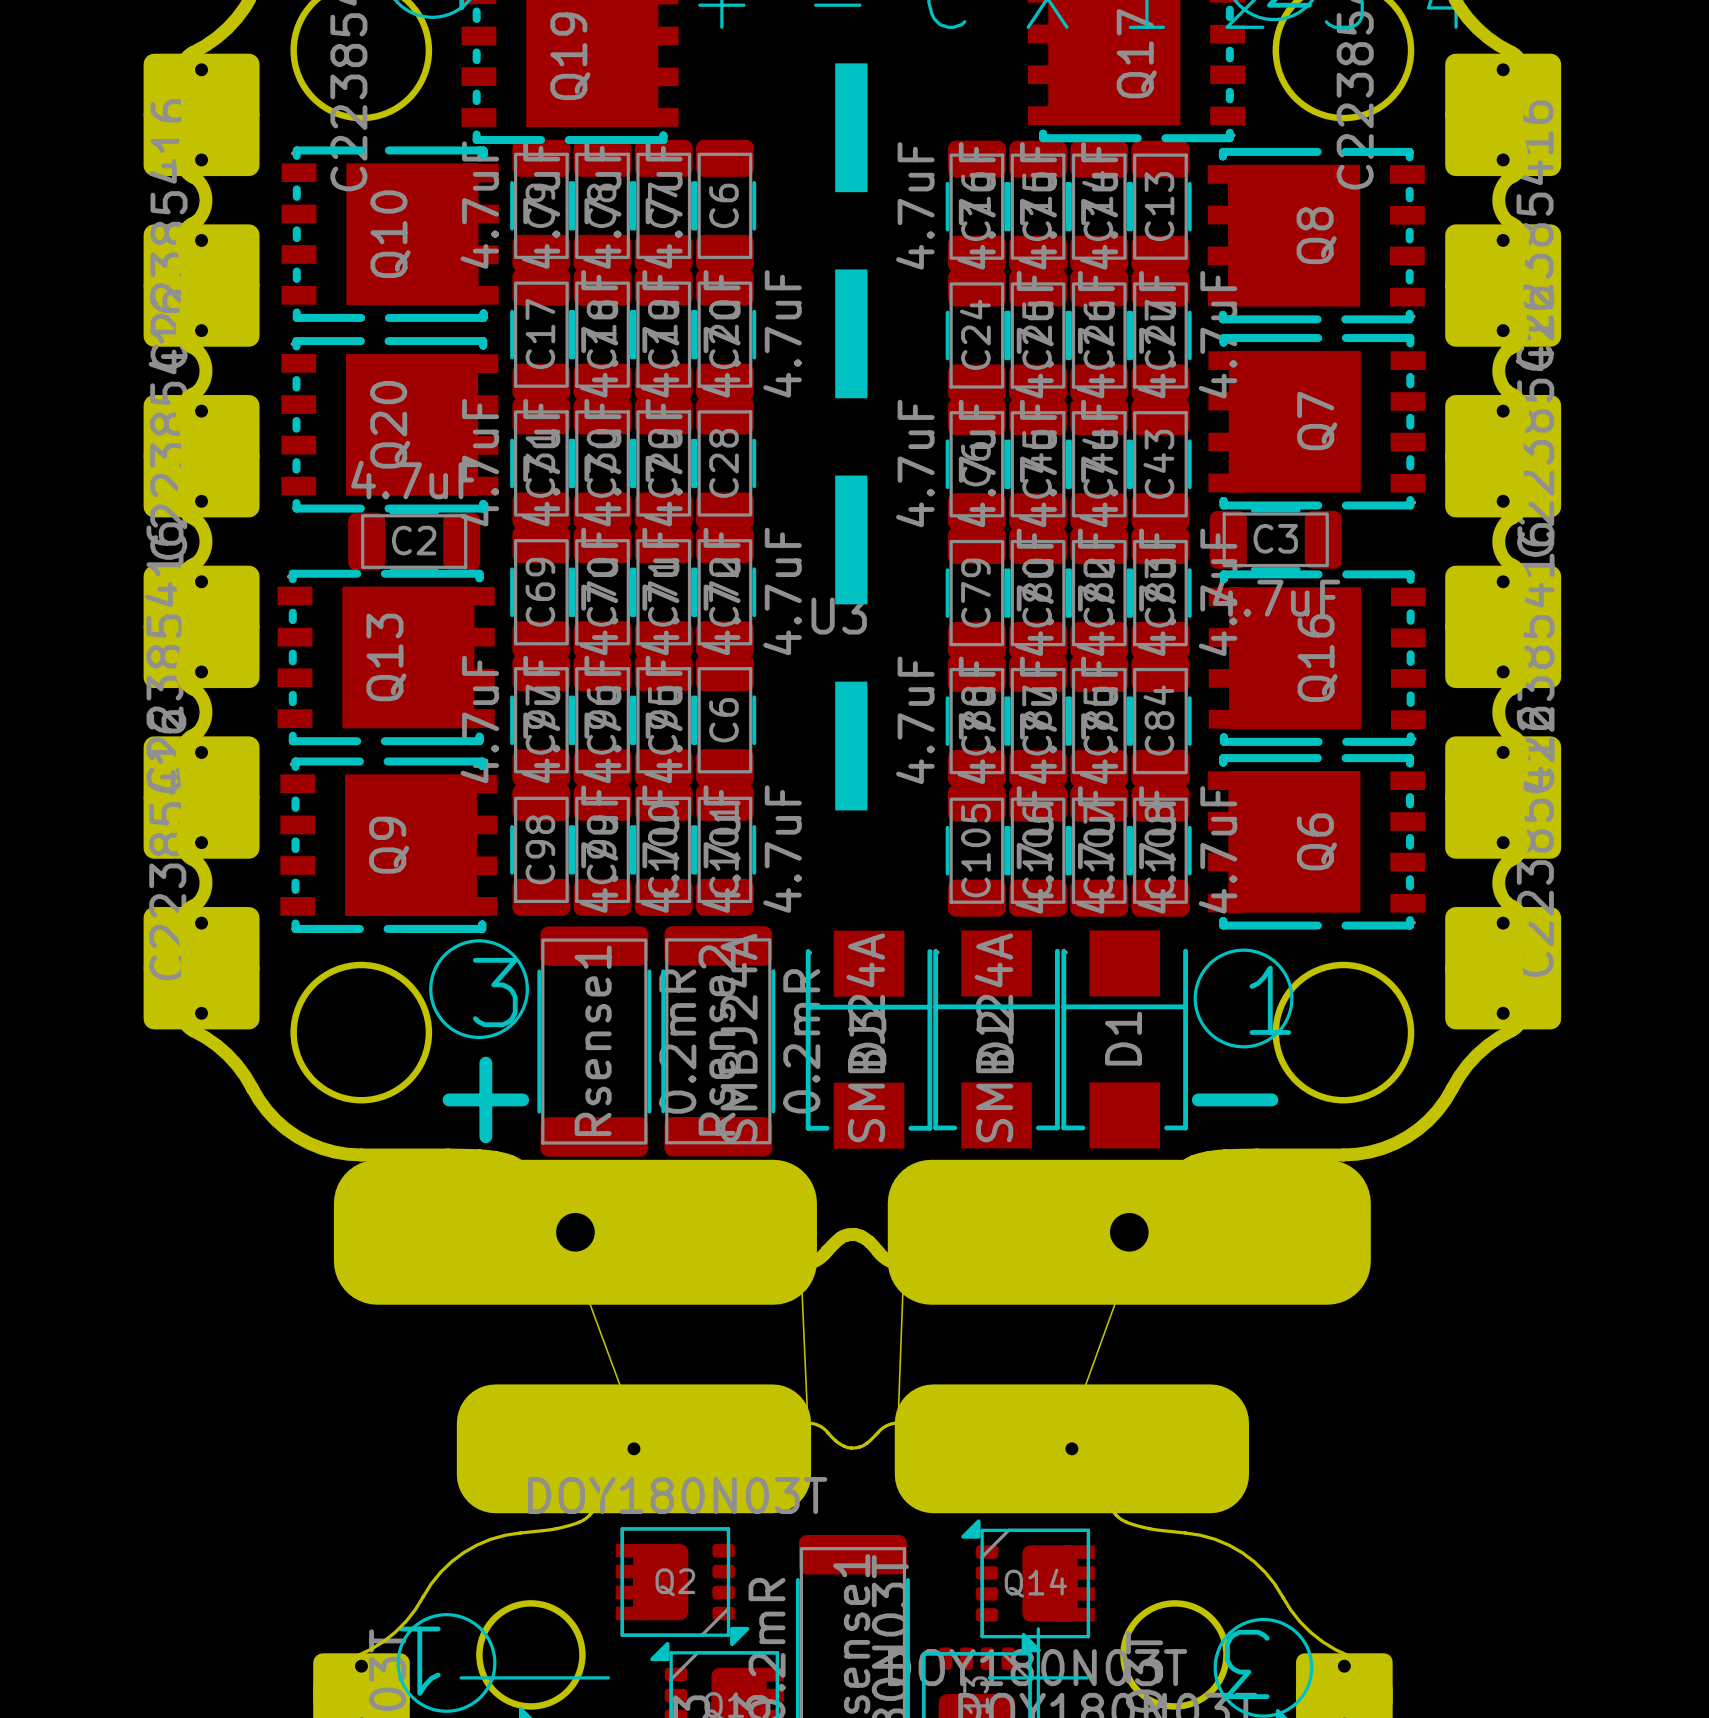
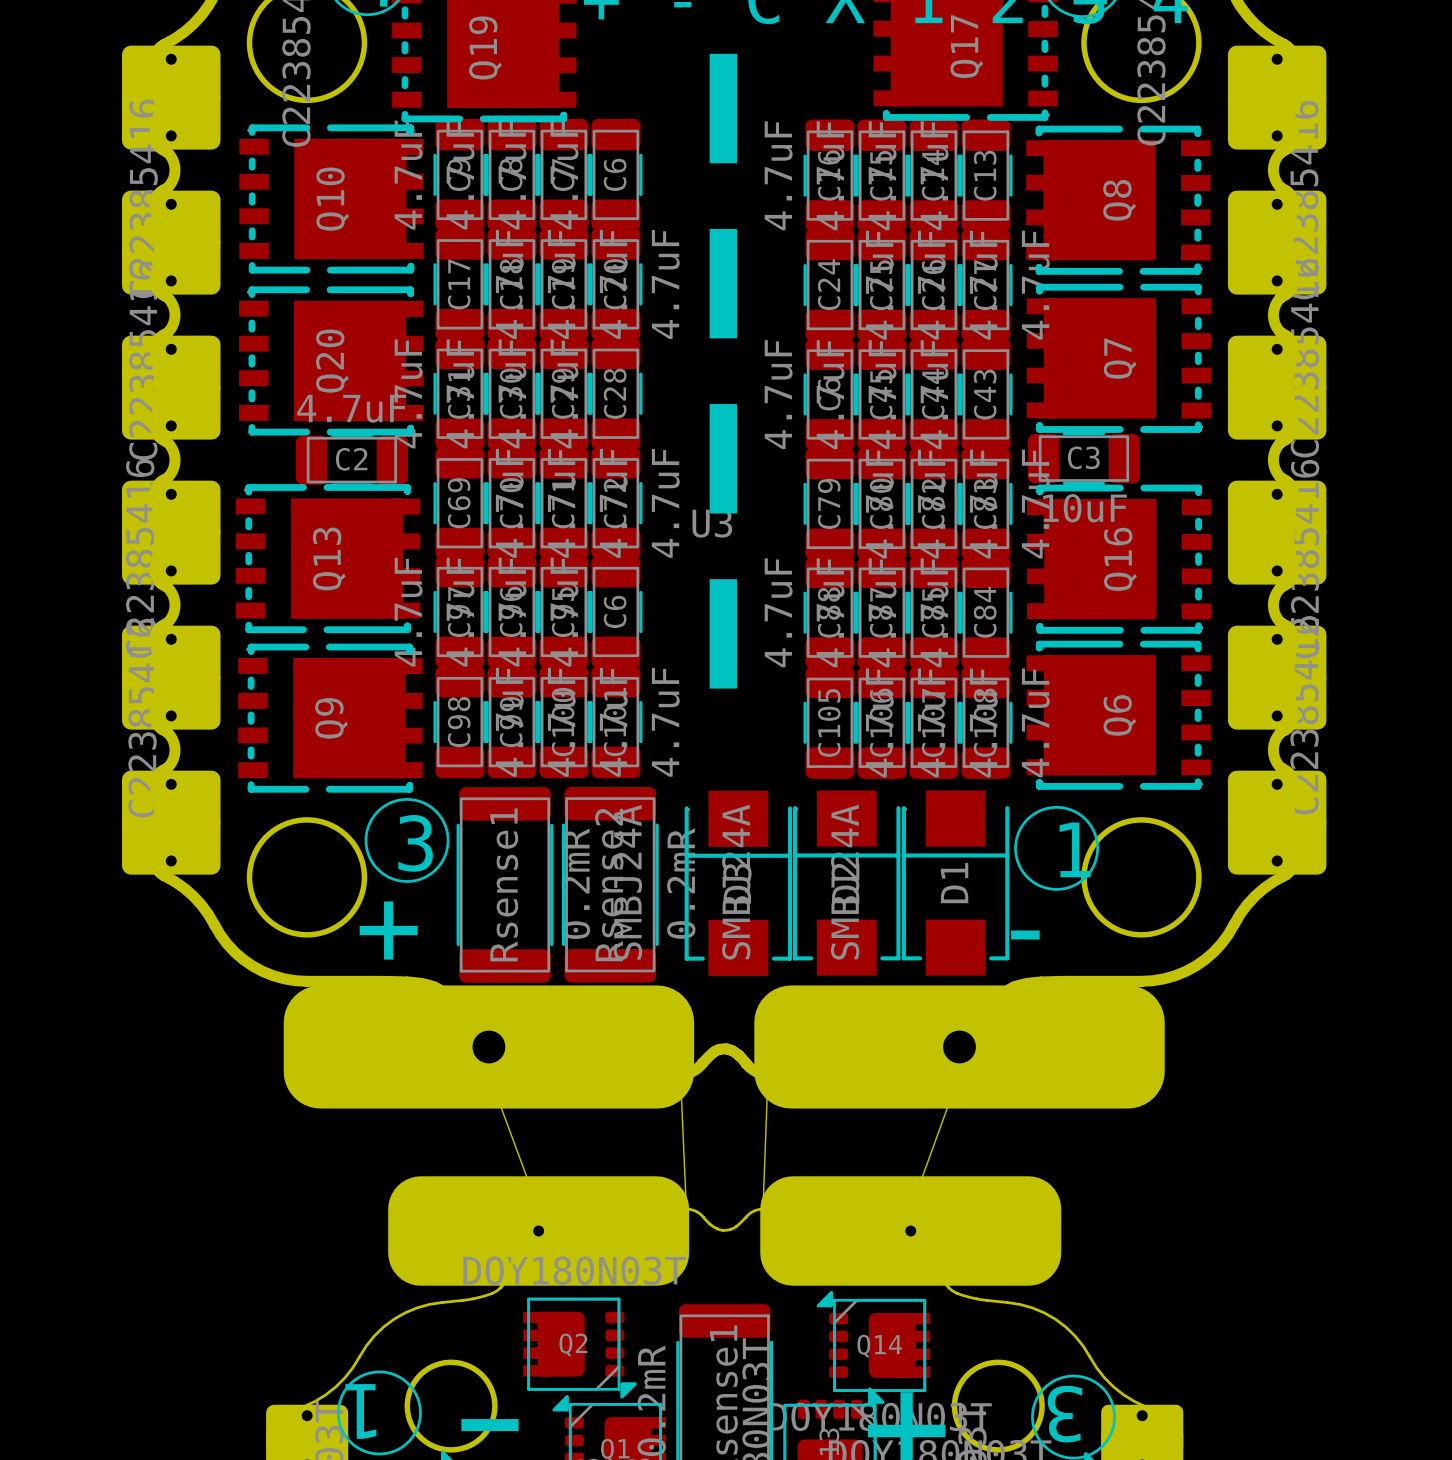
C3 value: 4.7uF (1276, 597) -> 10uF (1085, 508)

